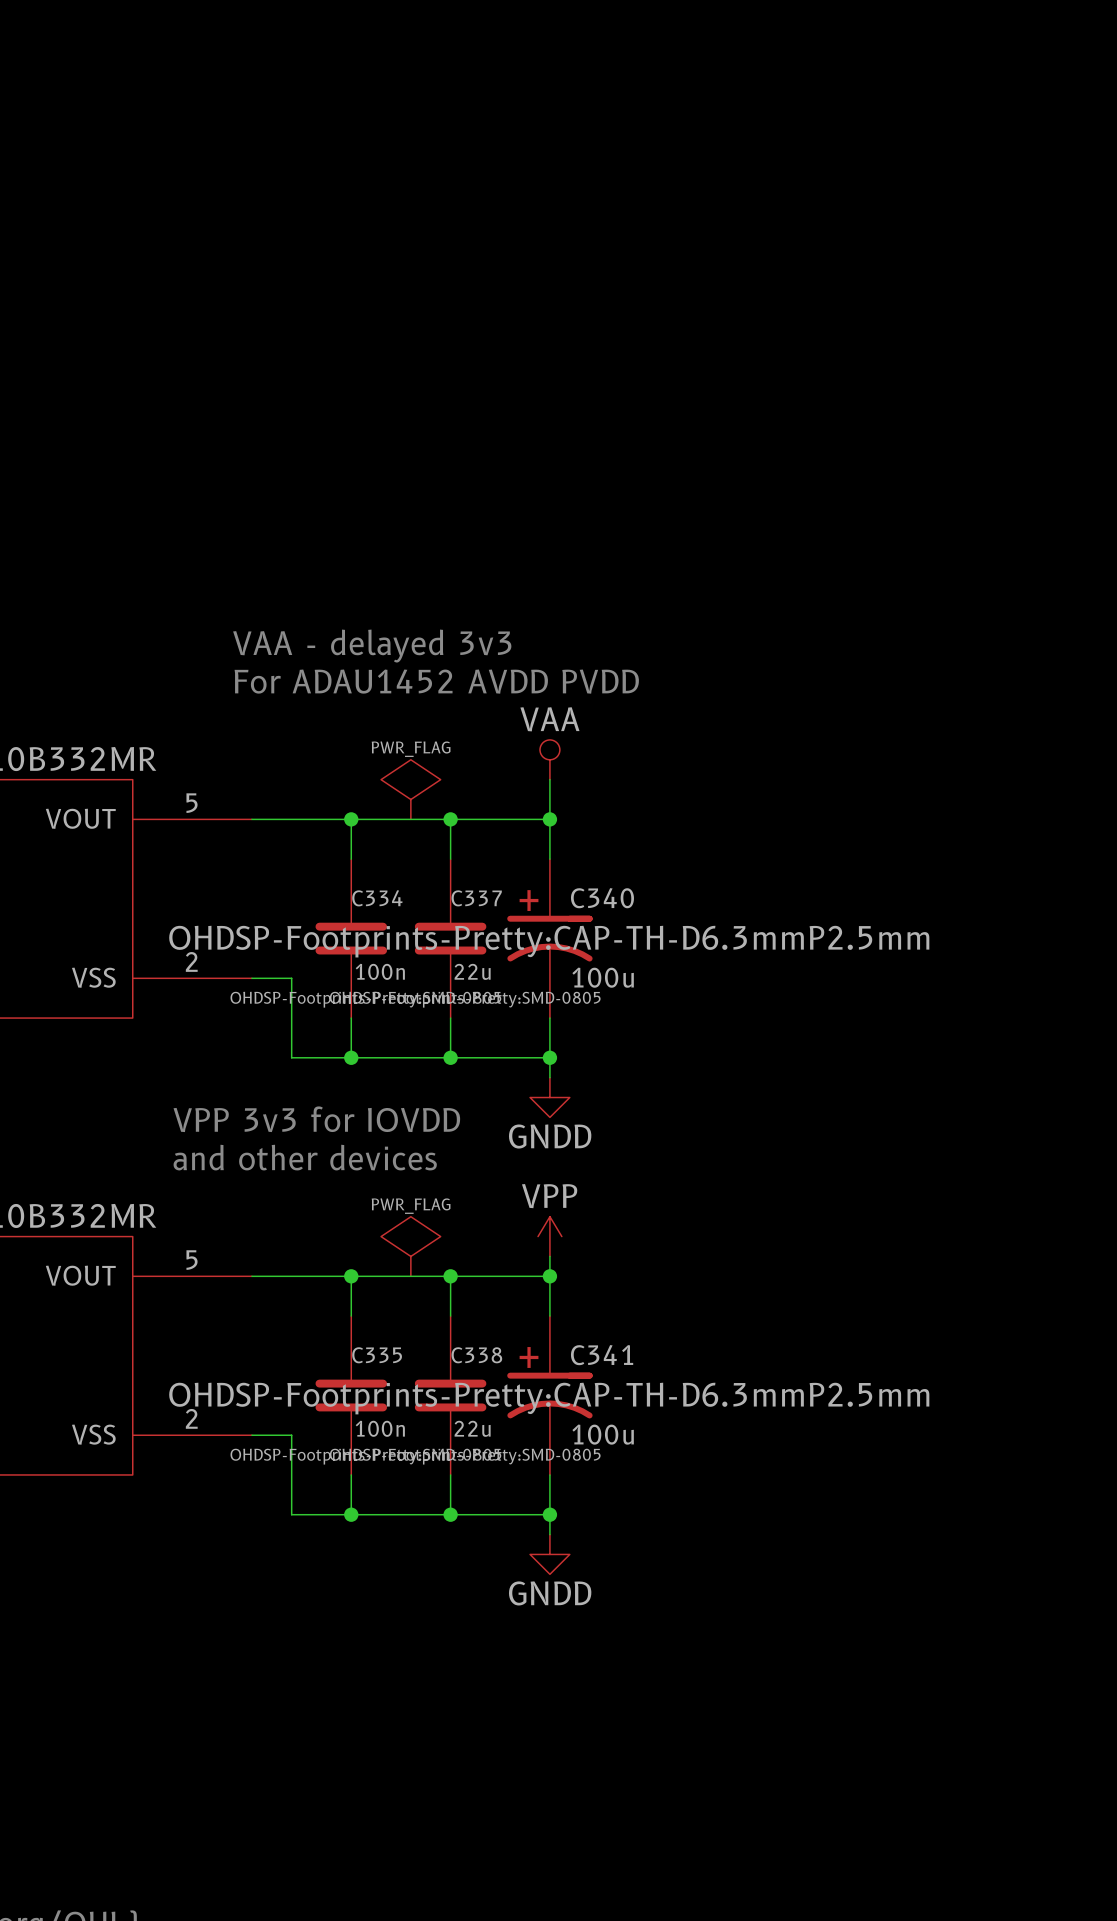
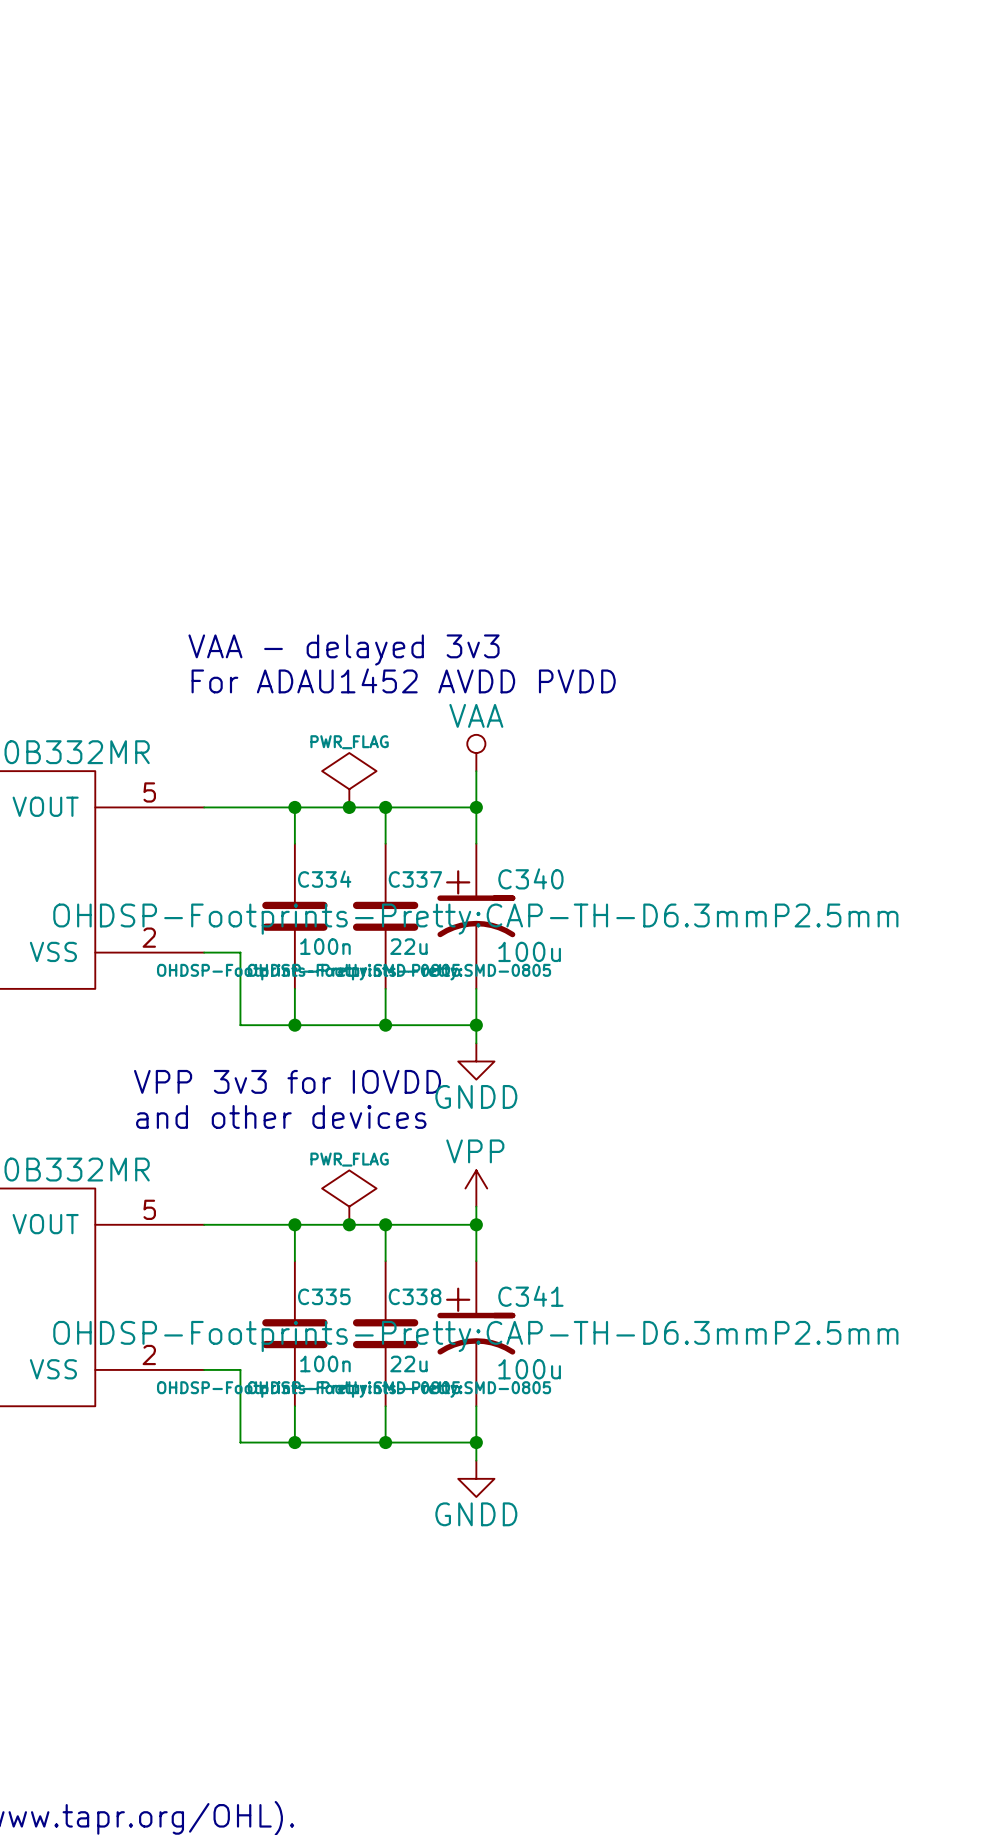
junction: none -> (349, 807)
junction: none -> (349, 1224)

